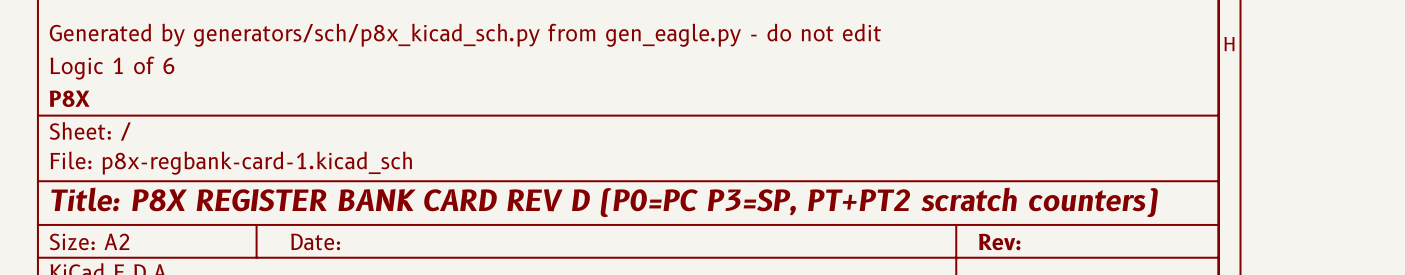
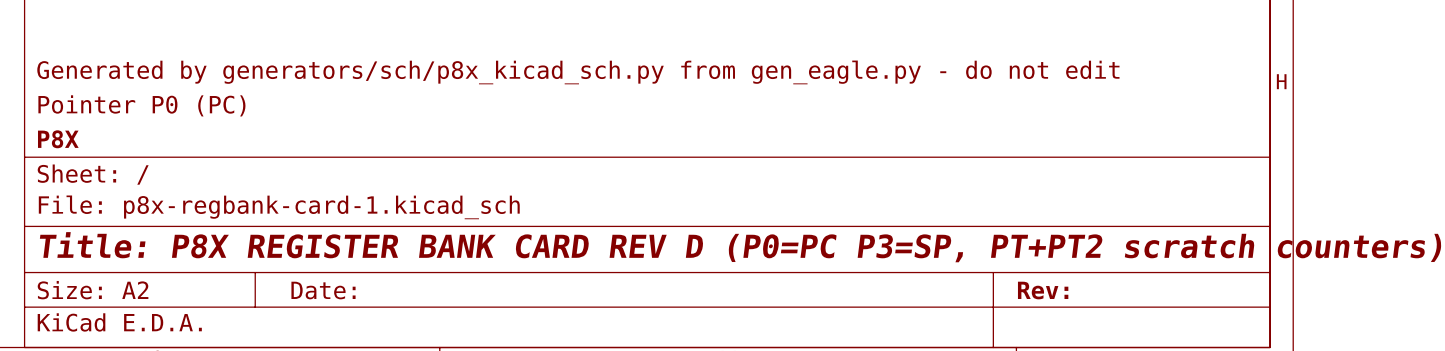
title block: Logic 1 of 6 (112, 68) -> Pointer P0 (PC) (141, 105)

